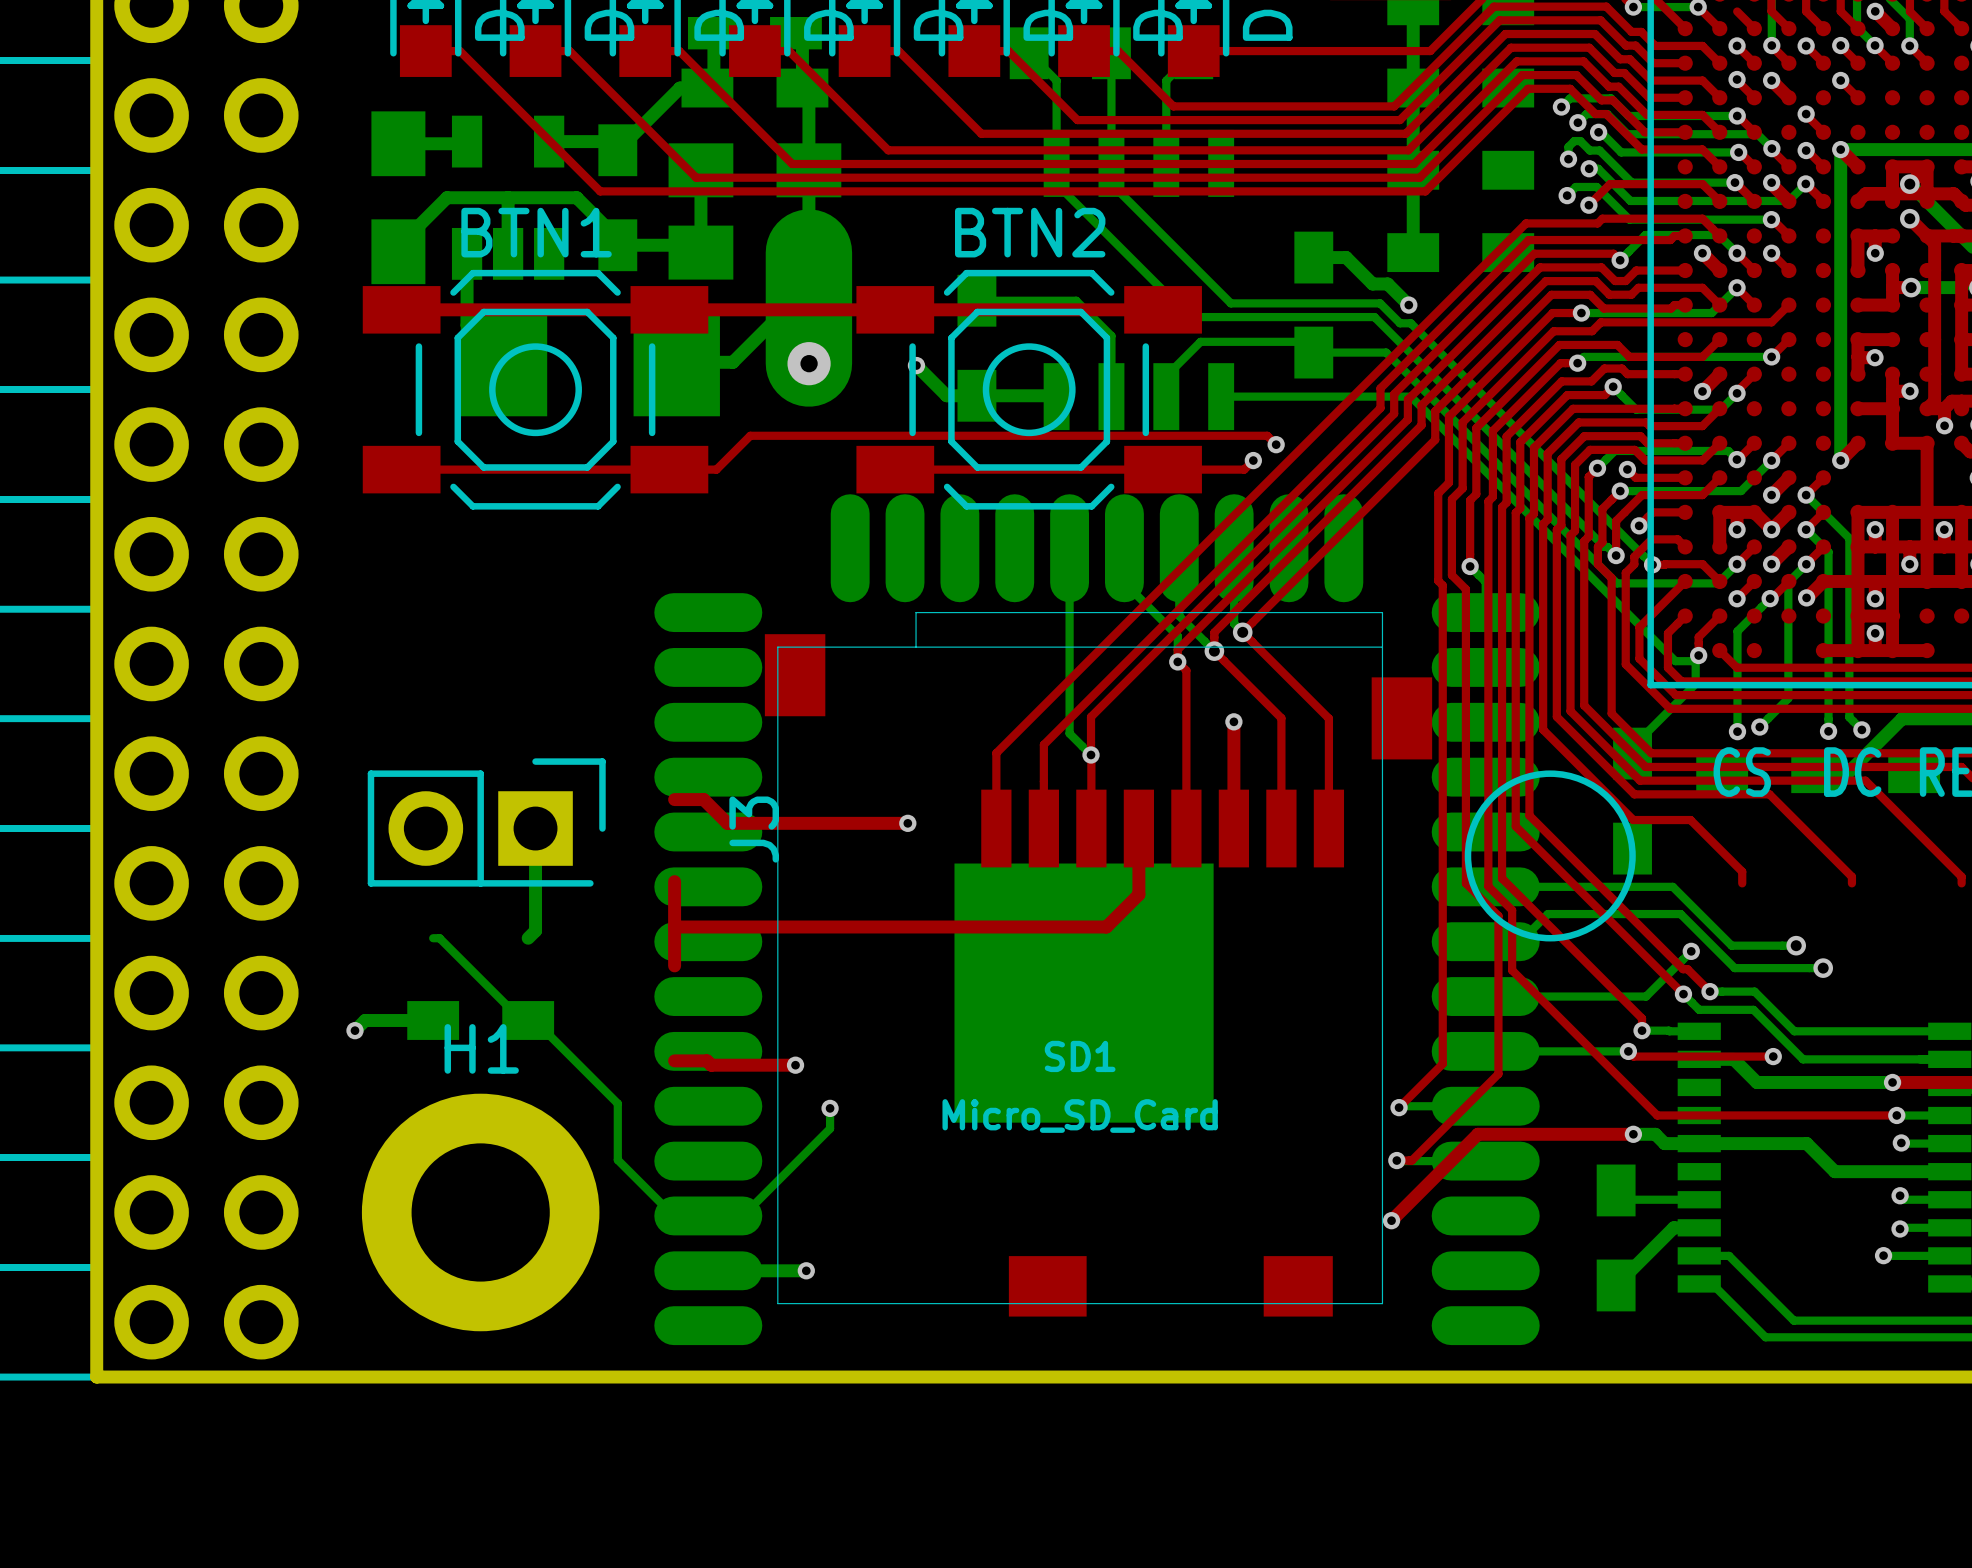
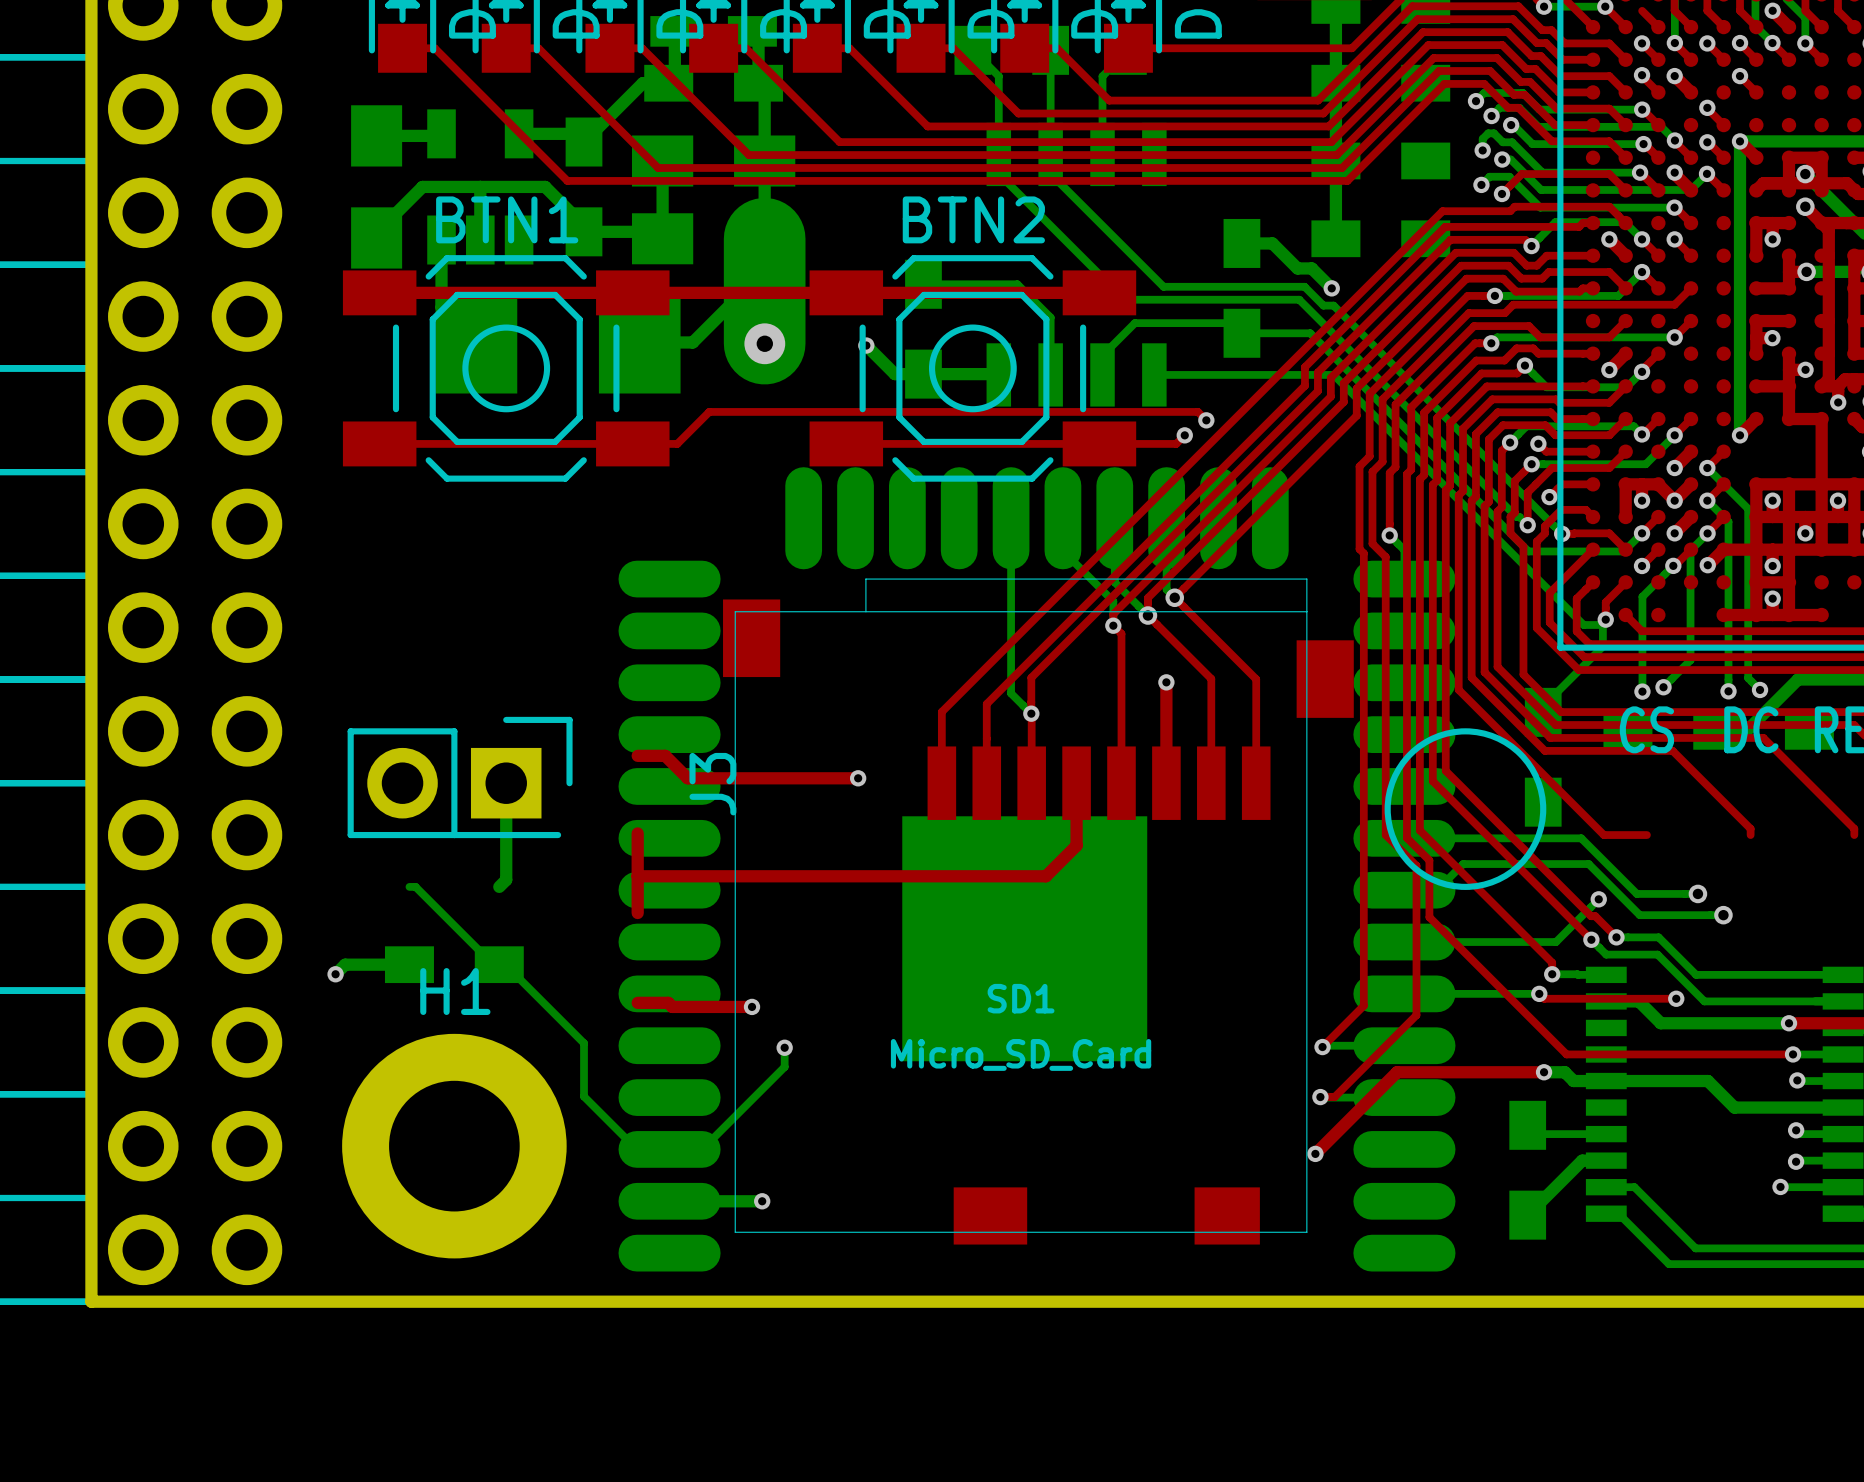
top track: (1633, 820) (1690, 820) (1742, 871) (1742, 883) -> (1544, 775) (1603, 835) (1646, 835)

